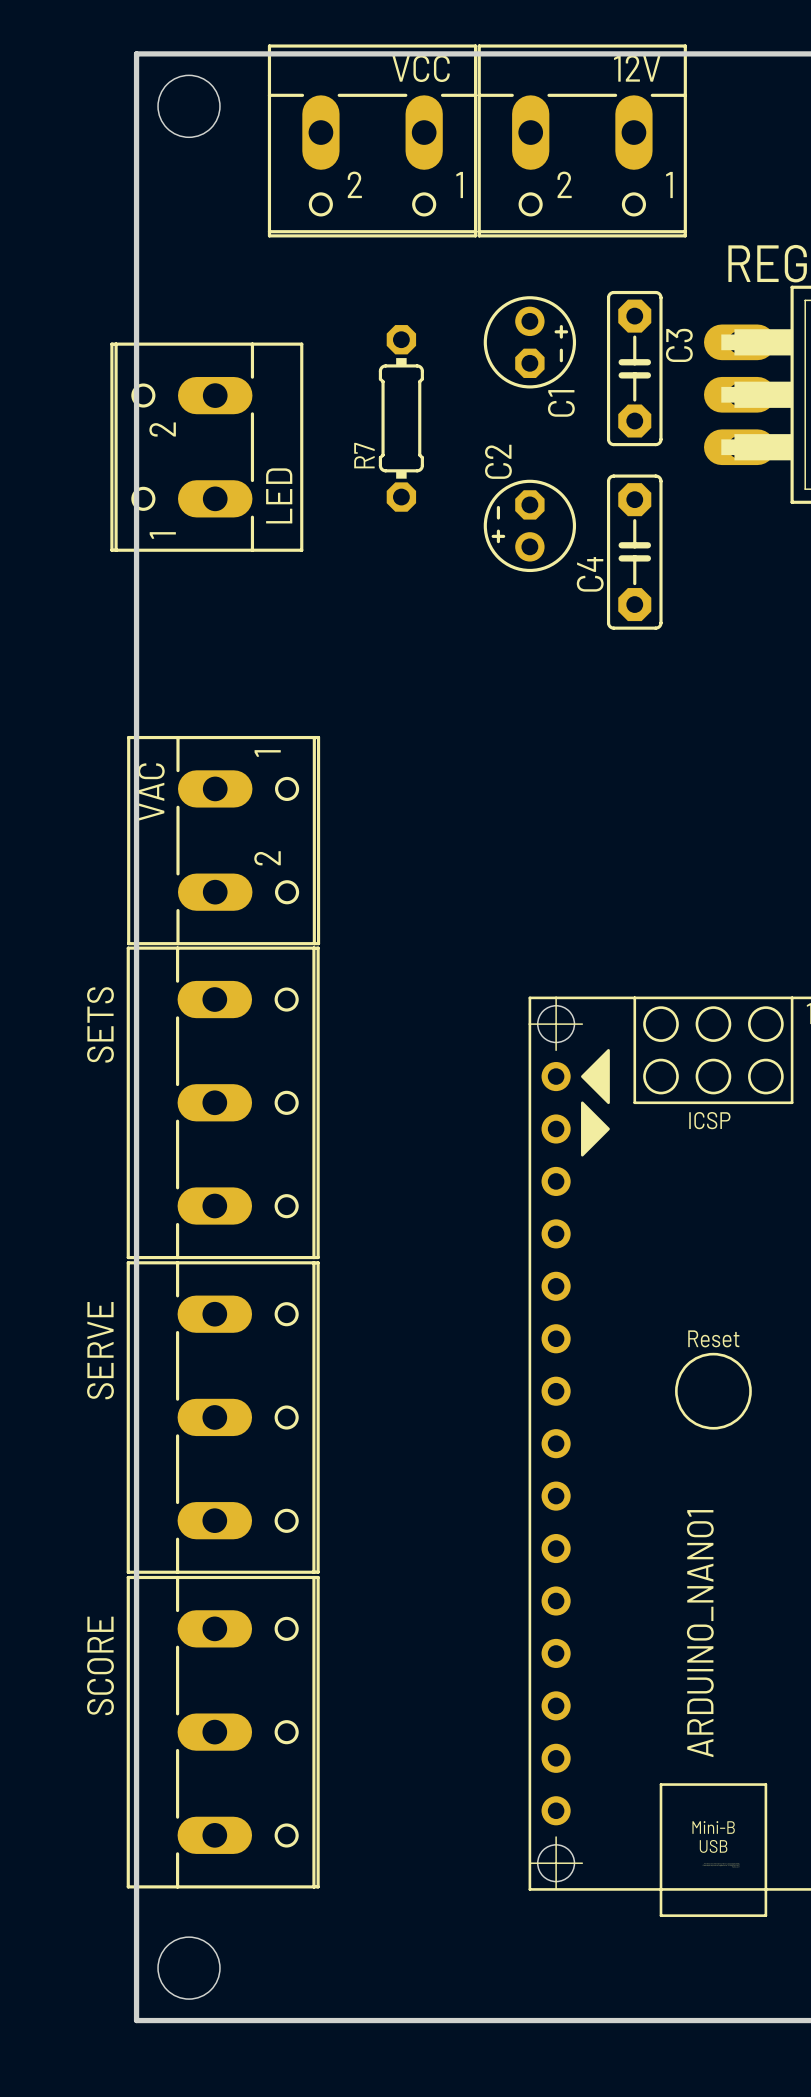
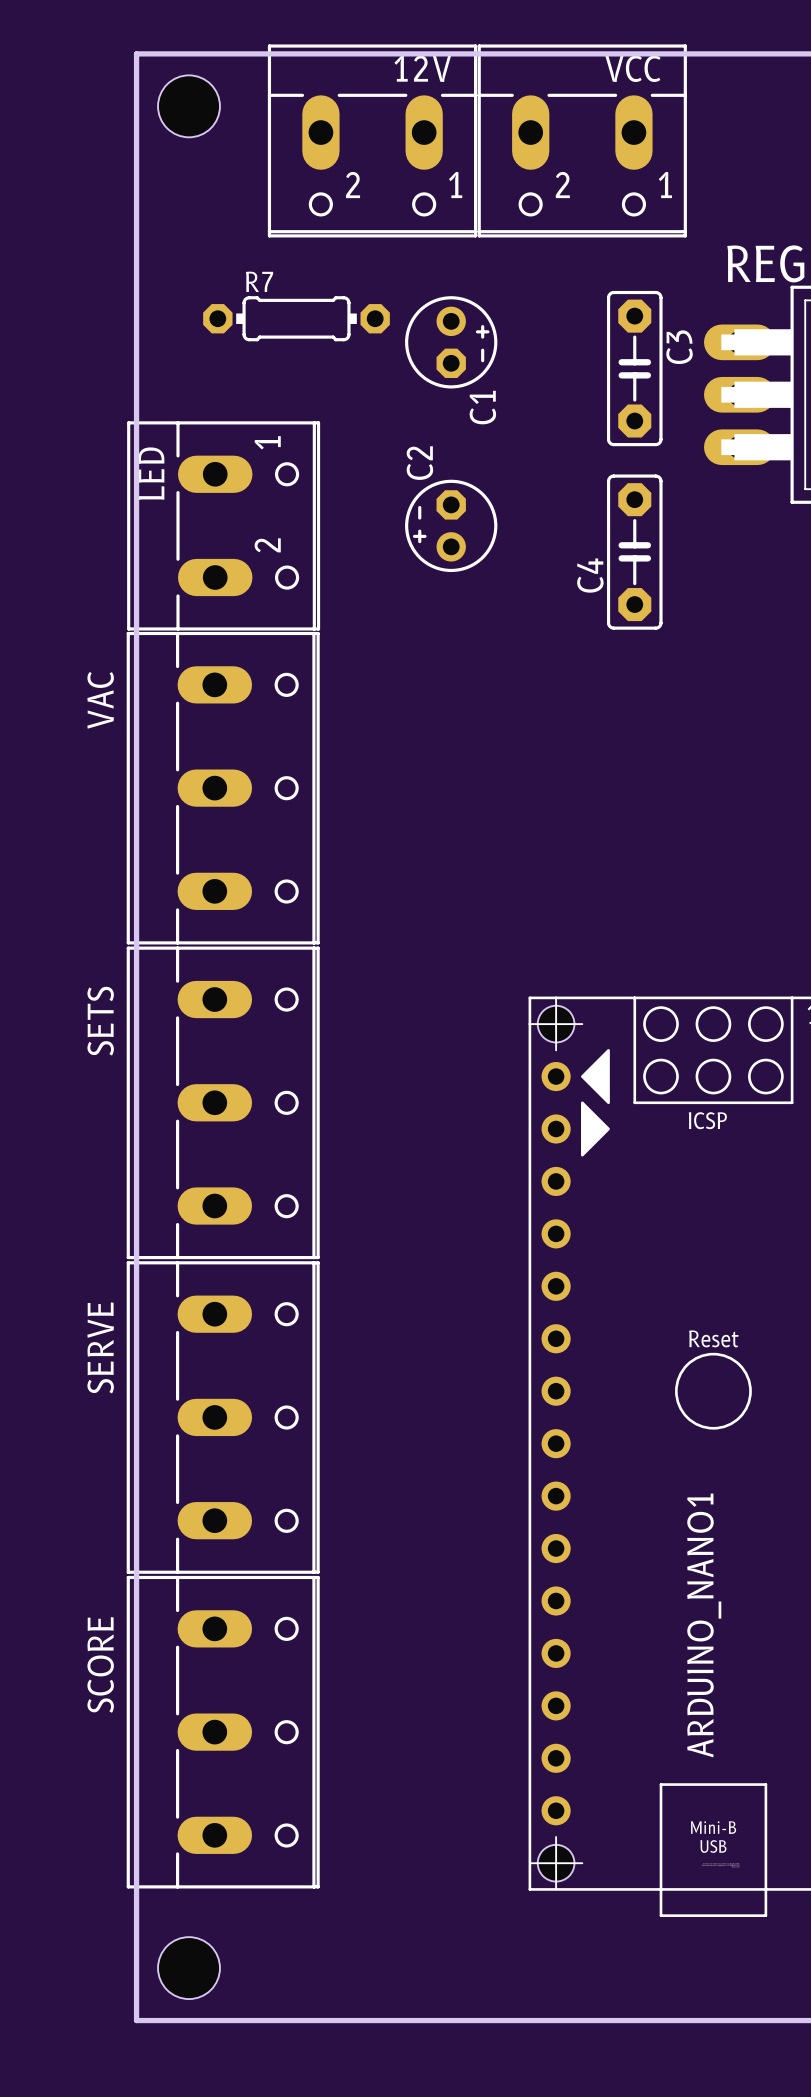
VCC name: VCC (421, 68) -> 12V (422, 68)
12V name: 12V (637, 68) -> VCC (632, 68)
C1 position: (529, 342) -> (451, 342)
R7 rotation: 0° (401, 418) -> 90° clockwise (296, 318)
R7 position: (401, 418) -> (296, 318)
LED: (206, 447) -> none
LED: none -> (223, 525)
C2 position: (529, 525) -> (451, 525)
VAC: none -> (223, 788)
VAC: (223, 840) -> none

